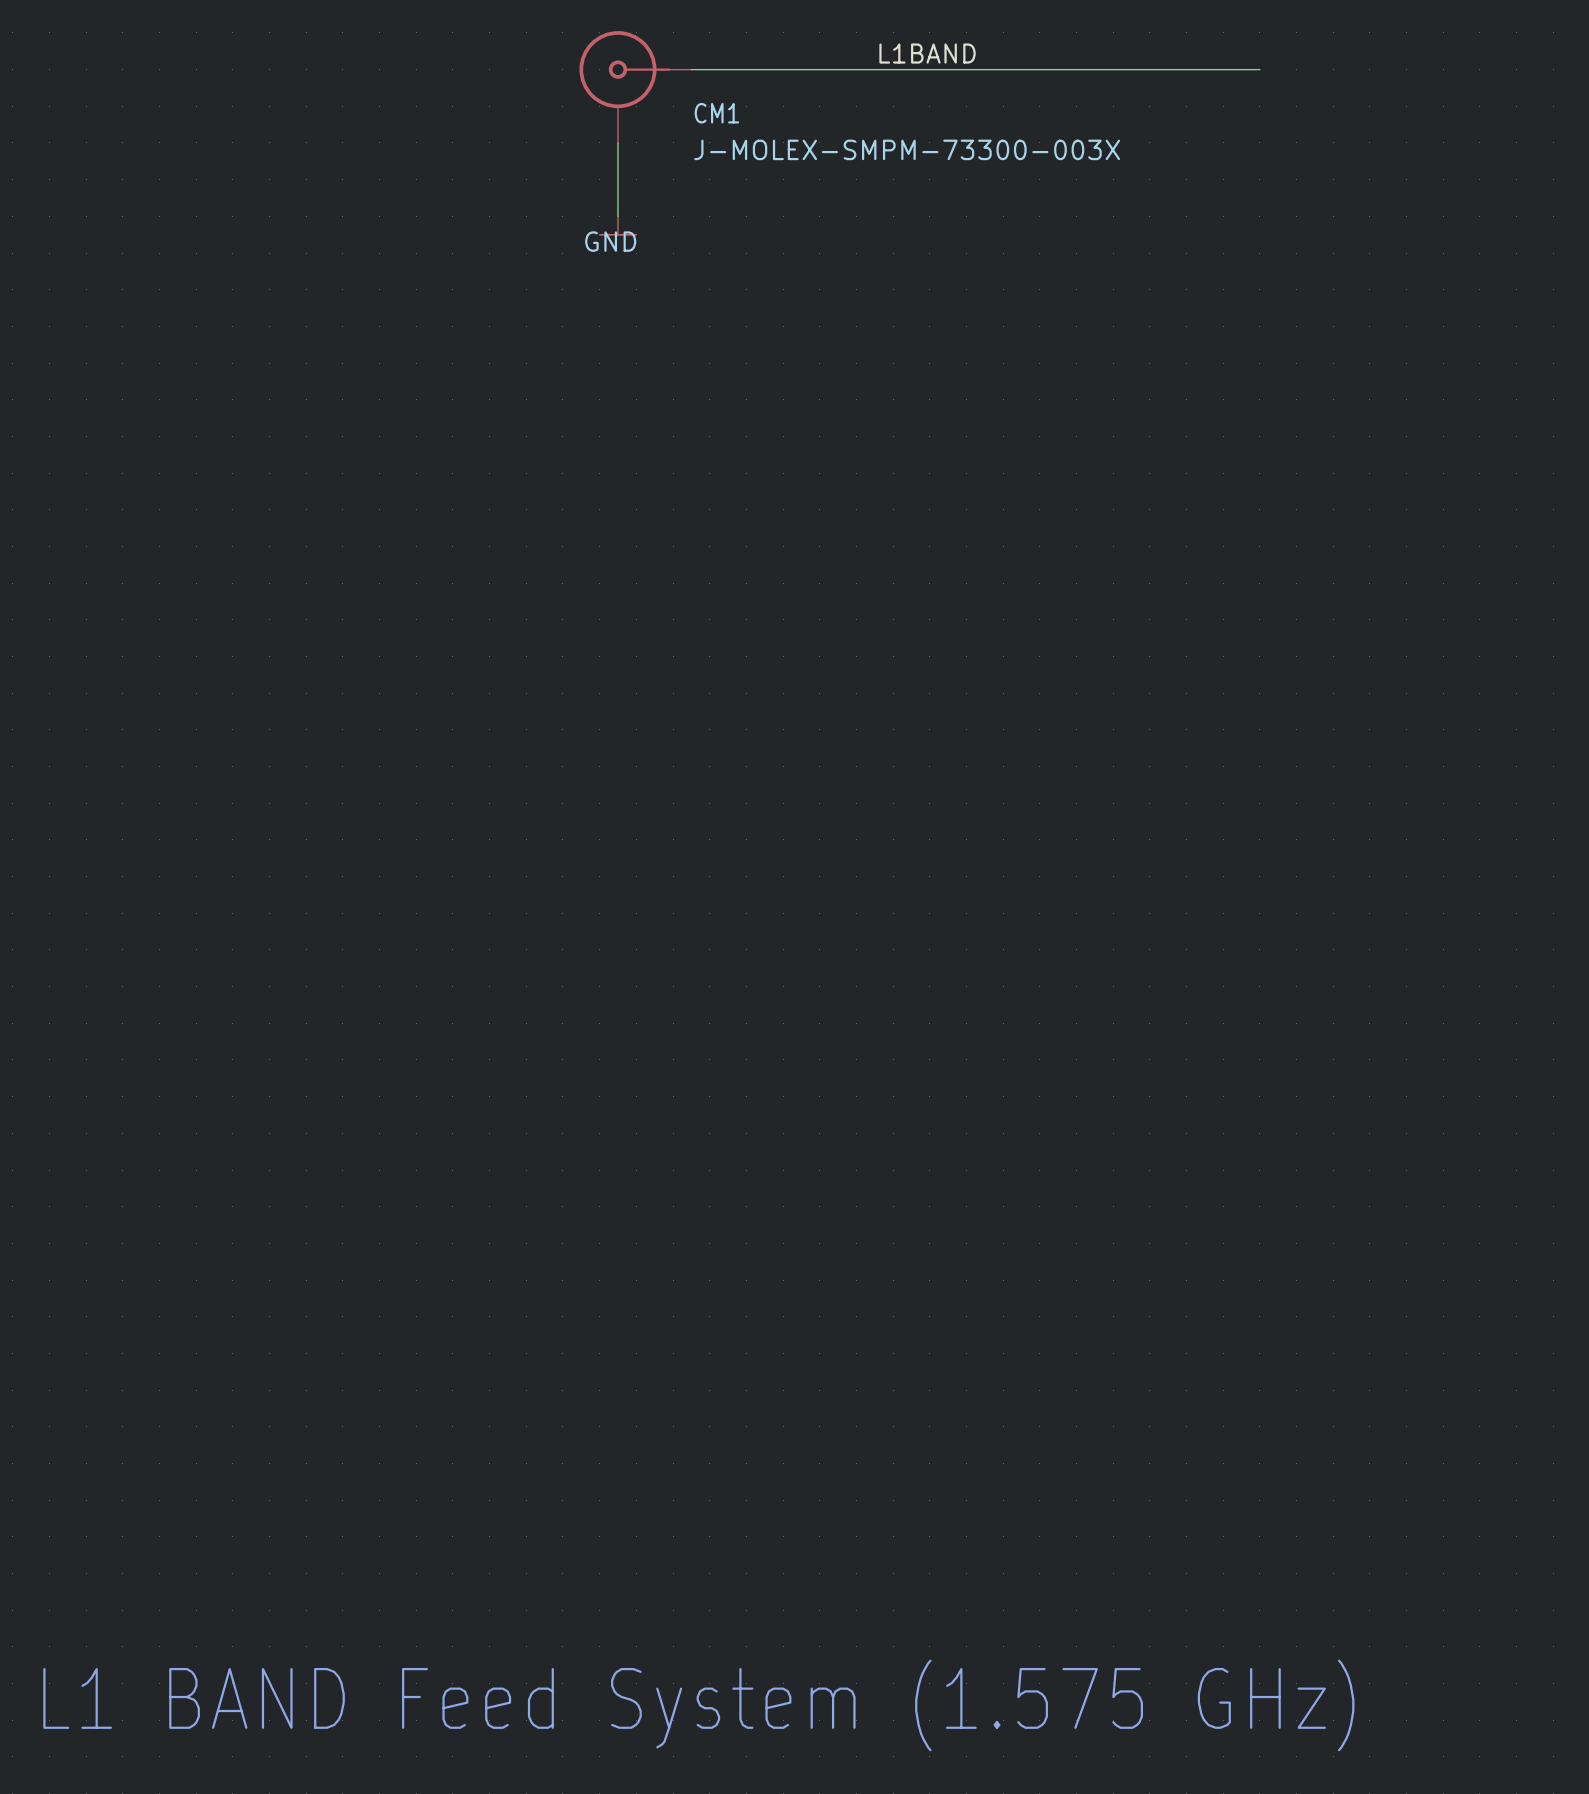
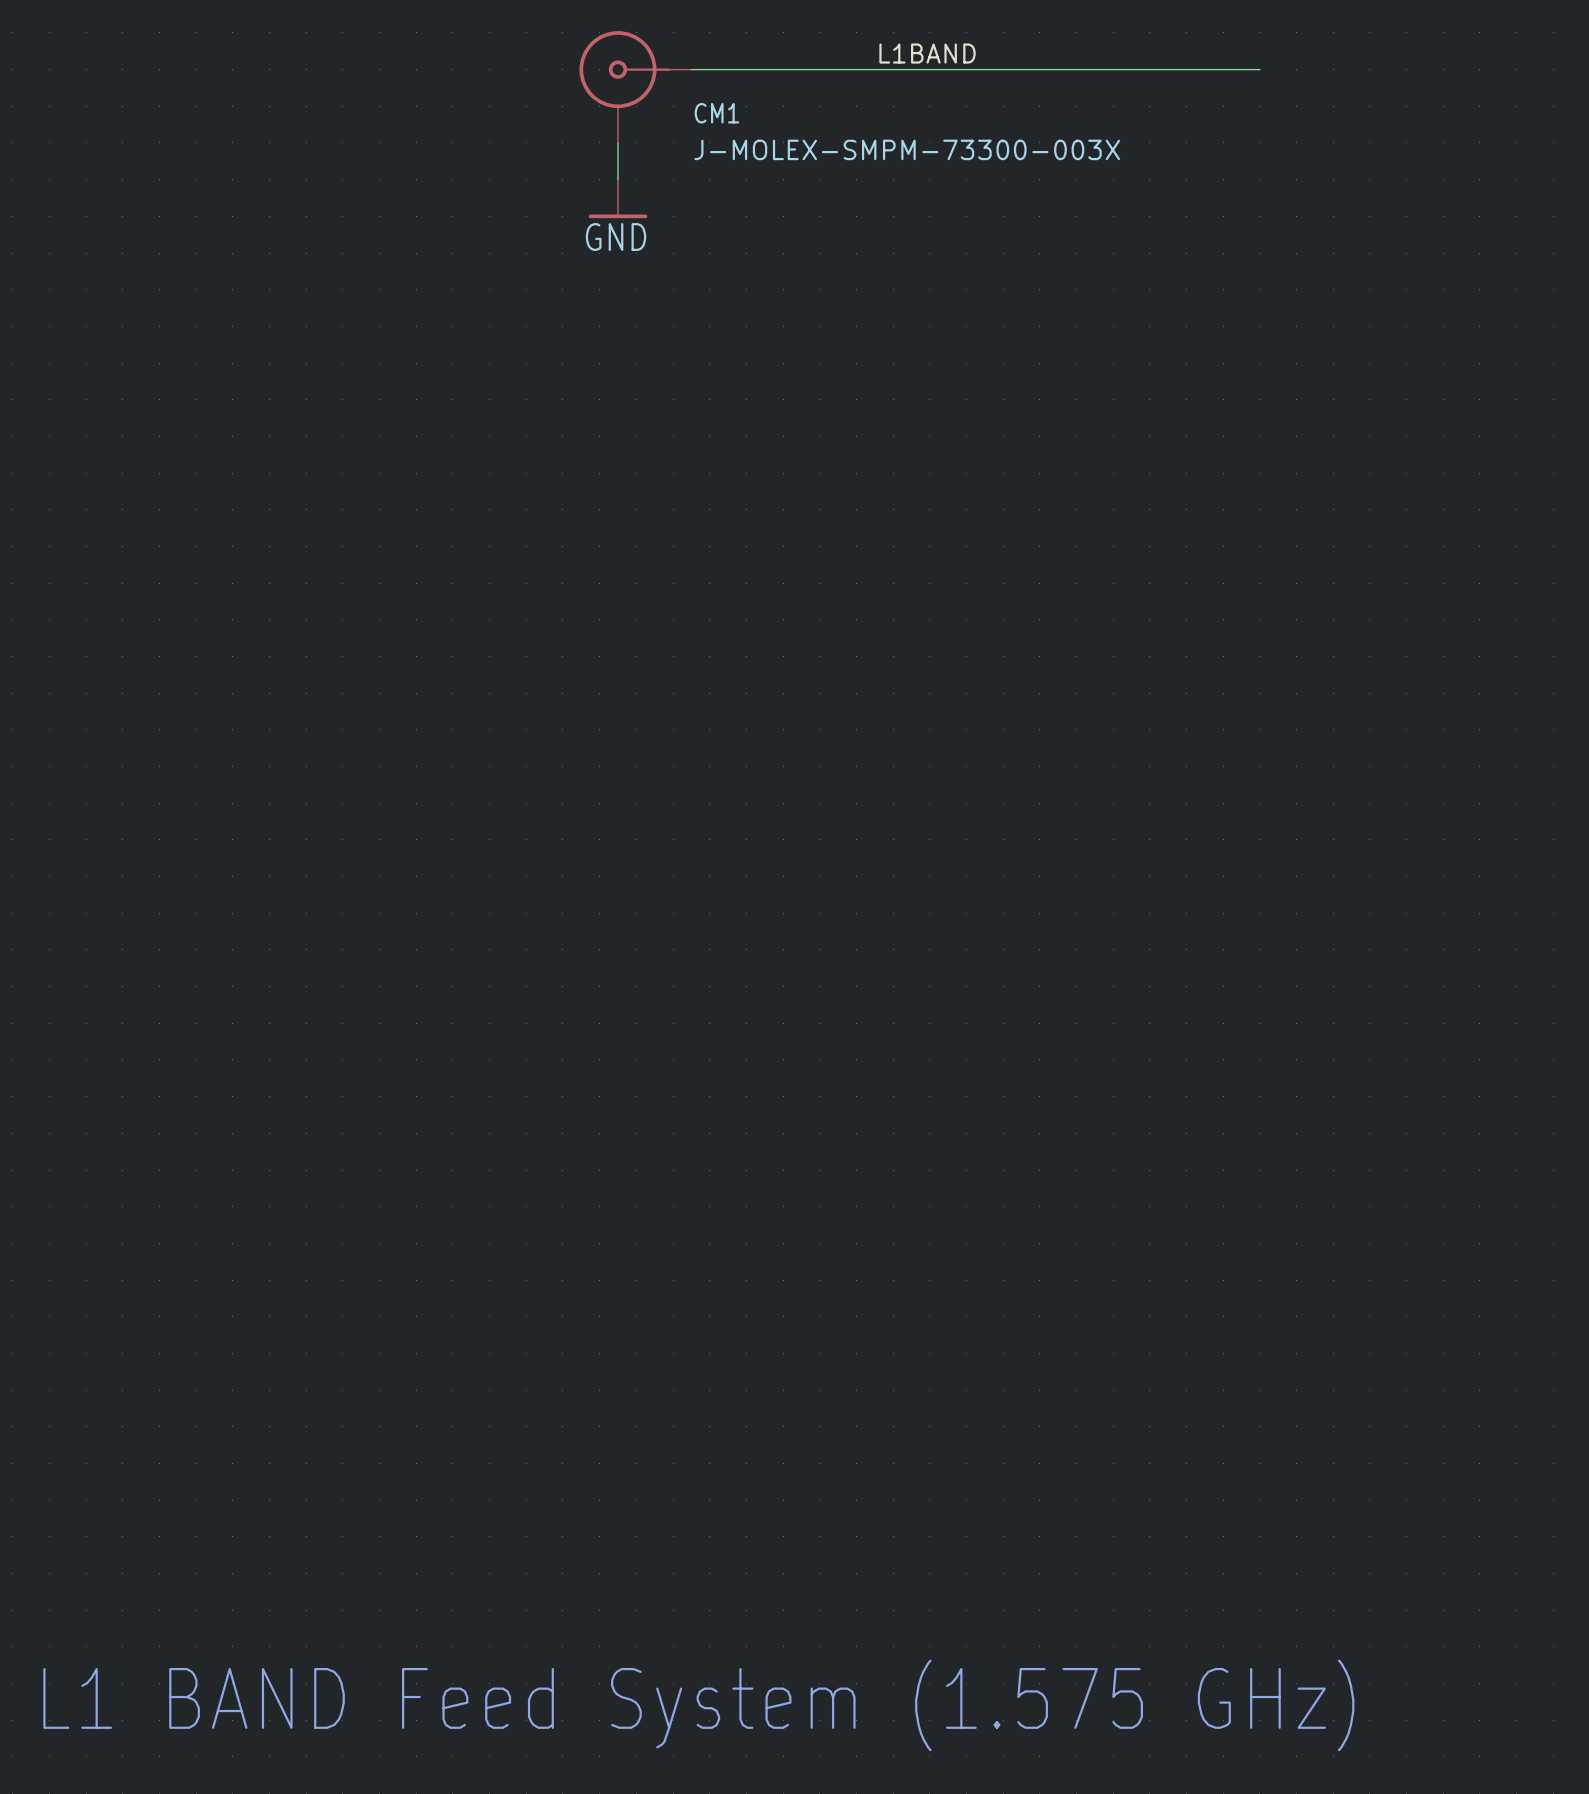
power symbol: none -> GND (617, 198)
power symbol: GND (617, 225) -> none

